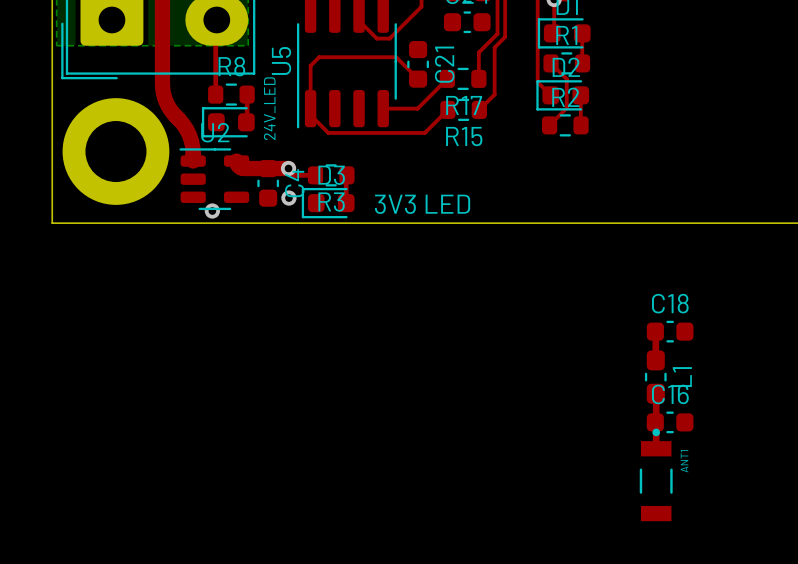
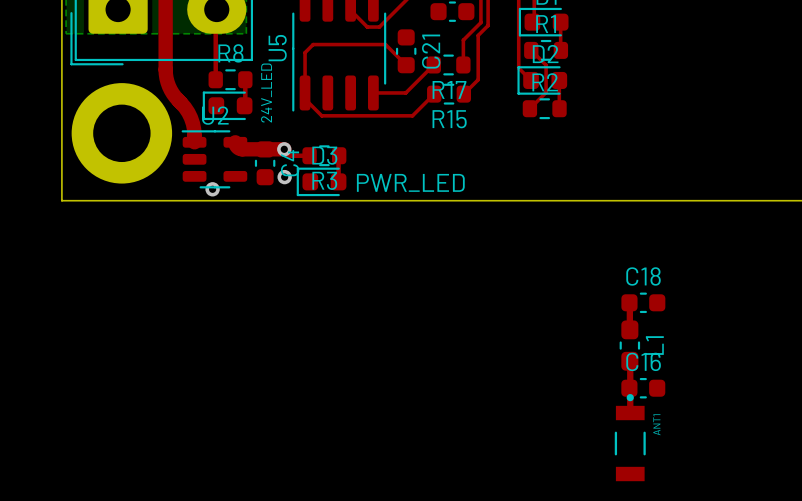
D3 value: 3V3 LED (422, 204) -> PWR_LED (410, 182)

